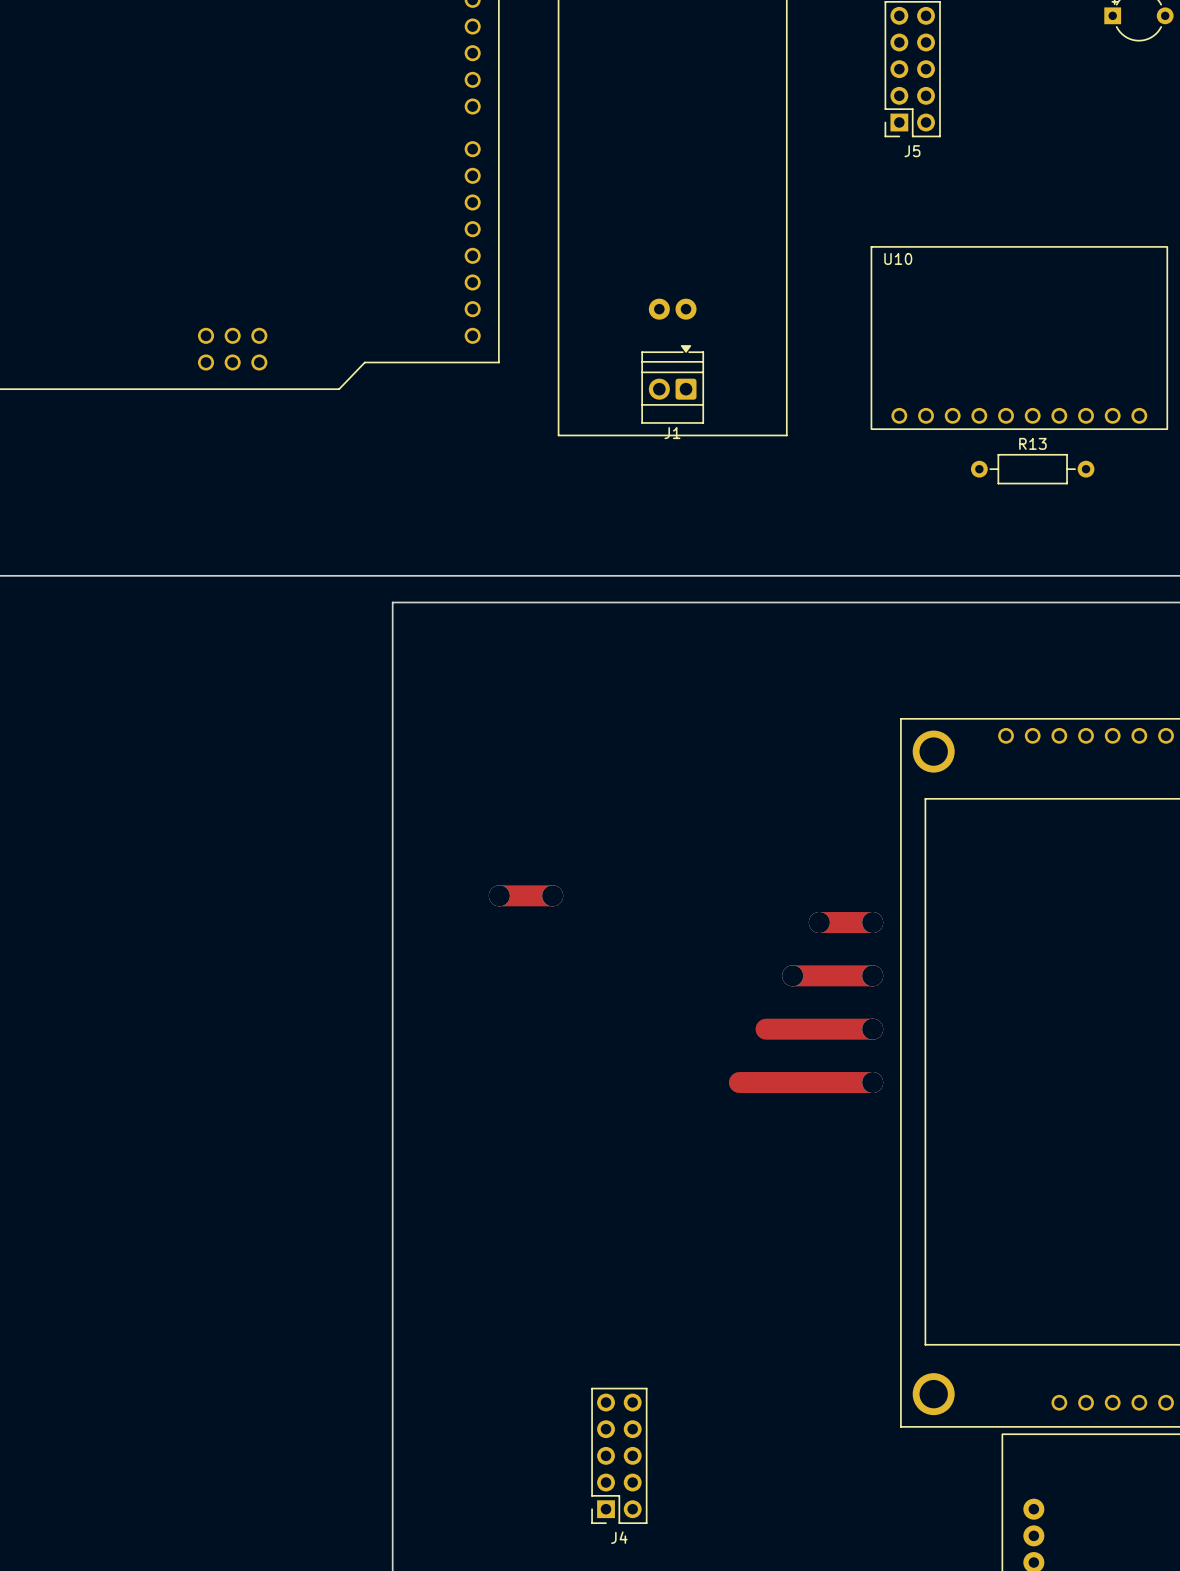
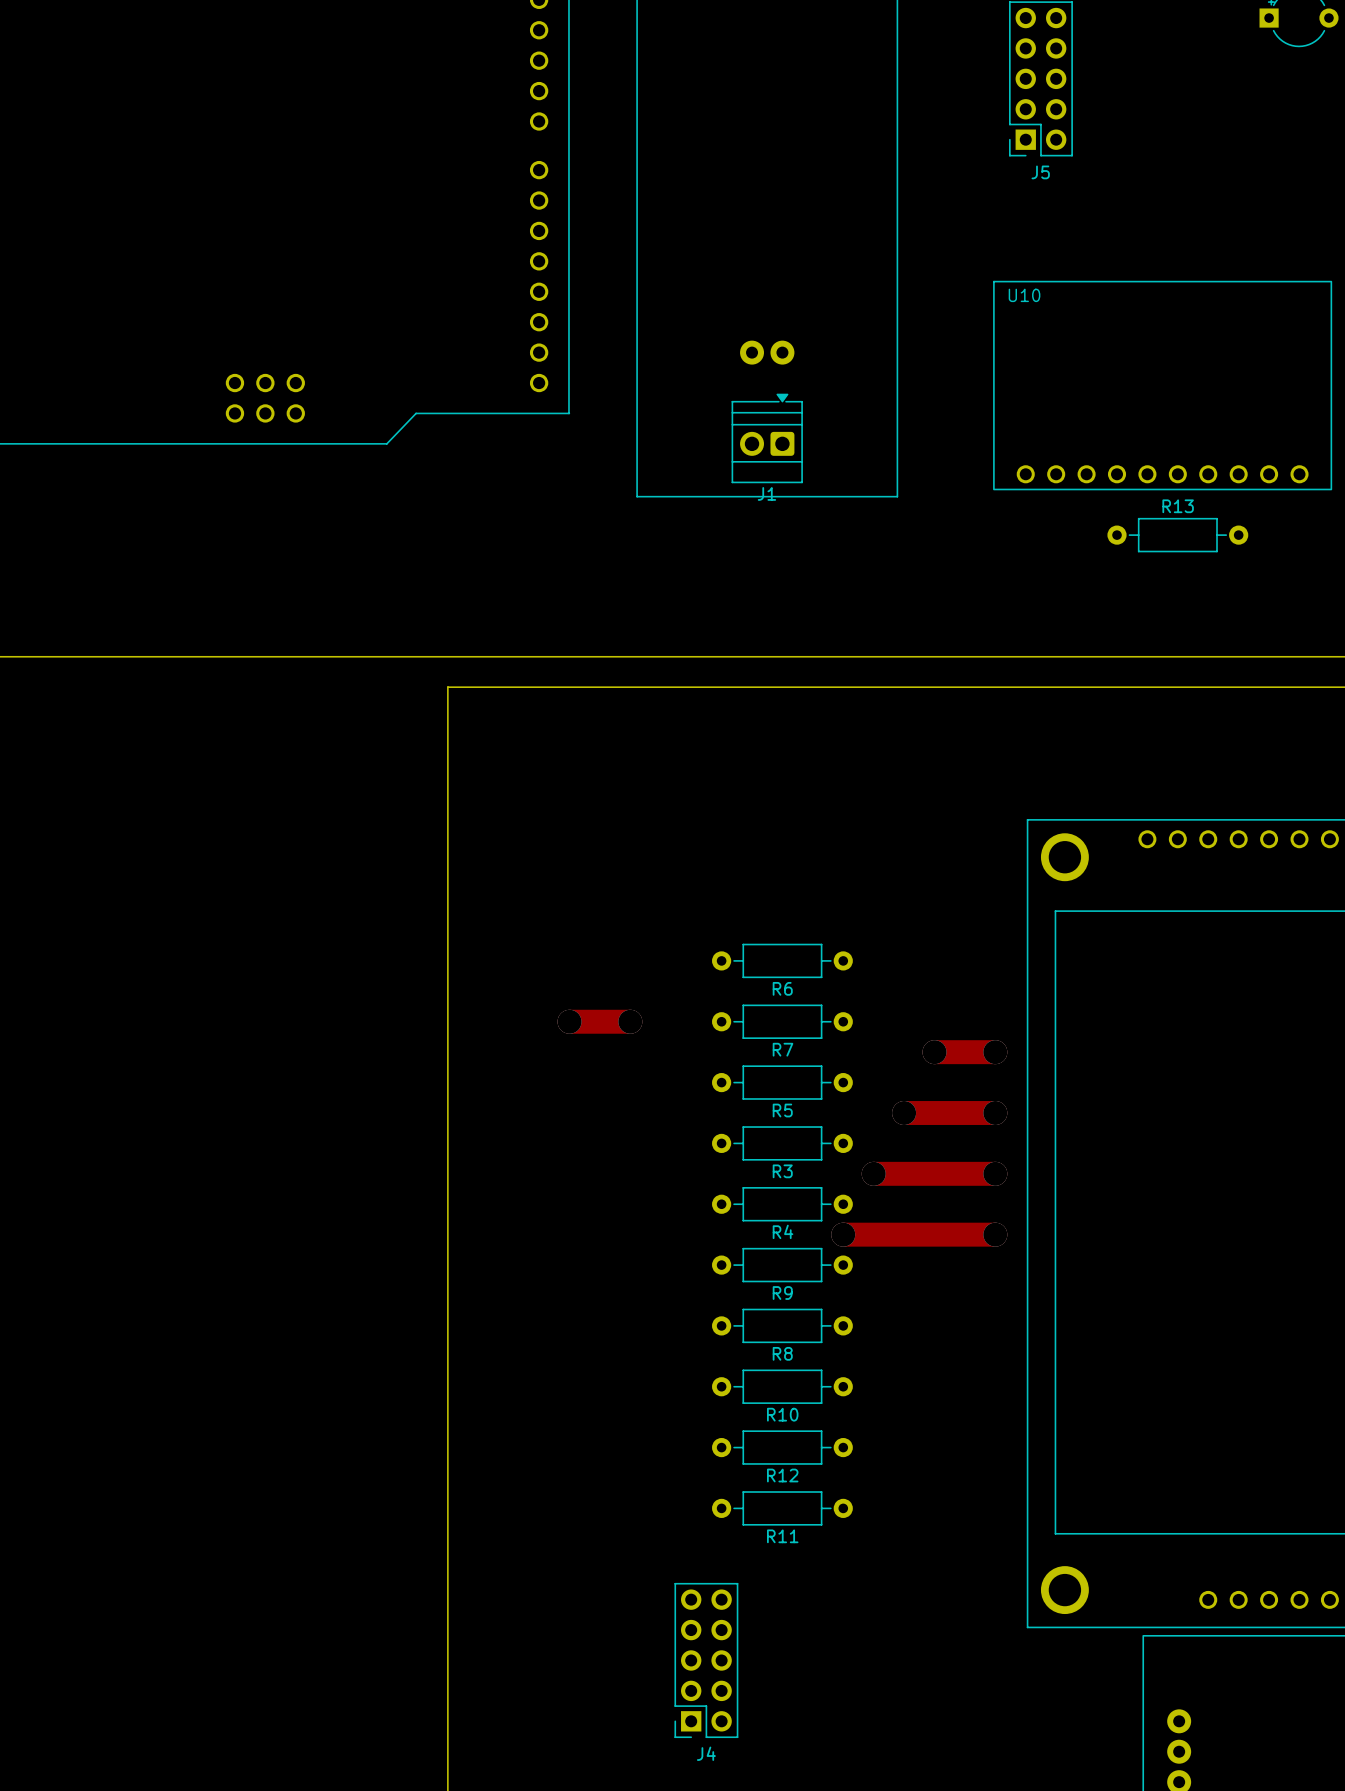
R6: none -> (782, 960)
R7: none -> (782, 1021)
R5: none -> (782, 1082)
R3: none -> (782, 1143)
via: none -> (873, 1173)
R4: none -> (782, 1204)
via: none -> (843, 1234)
R9: none -> (782, 1265)
R8: none -> (782, 1325)
R10: none -> (782, 1386)
R12: none -> (782, 1447)
R11: none -> (782, 1508)

